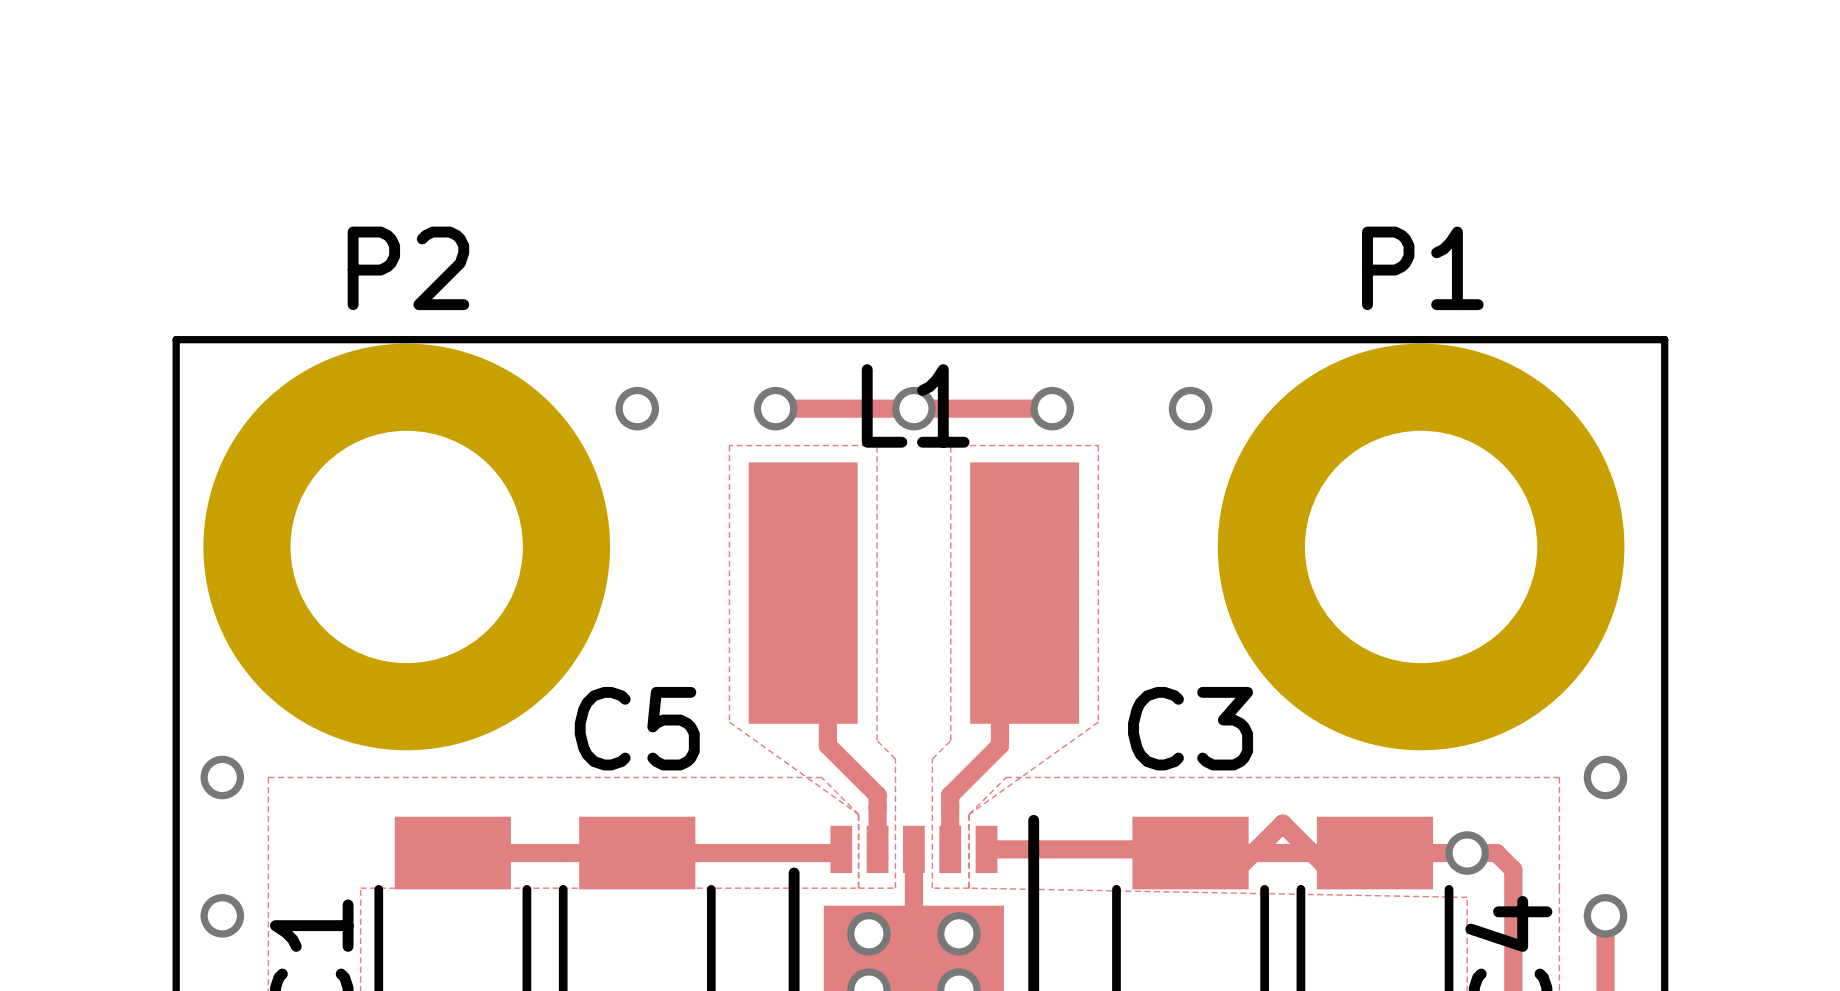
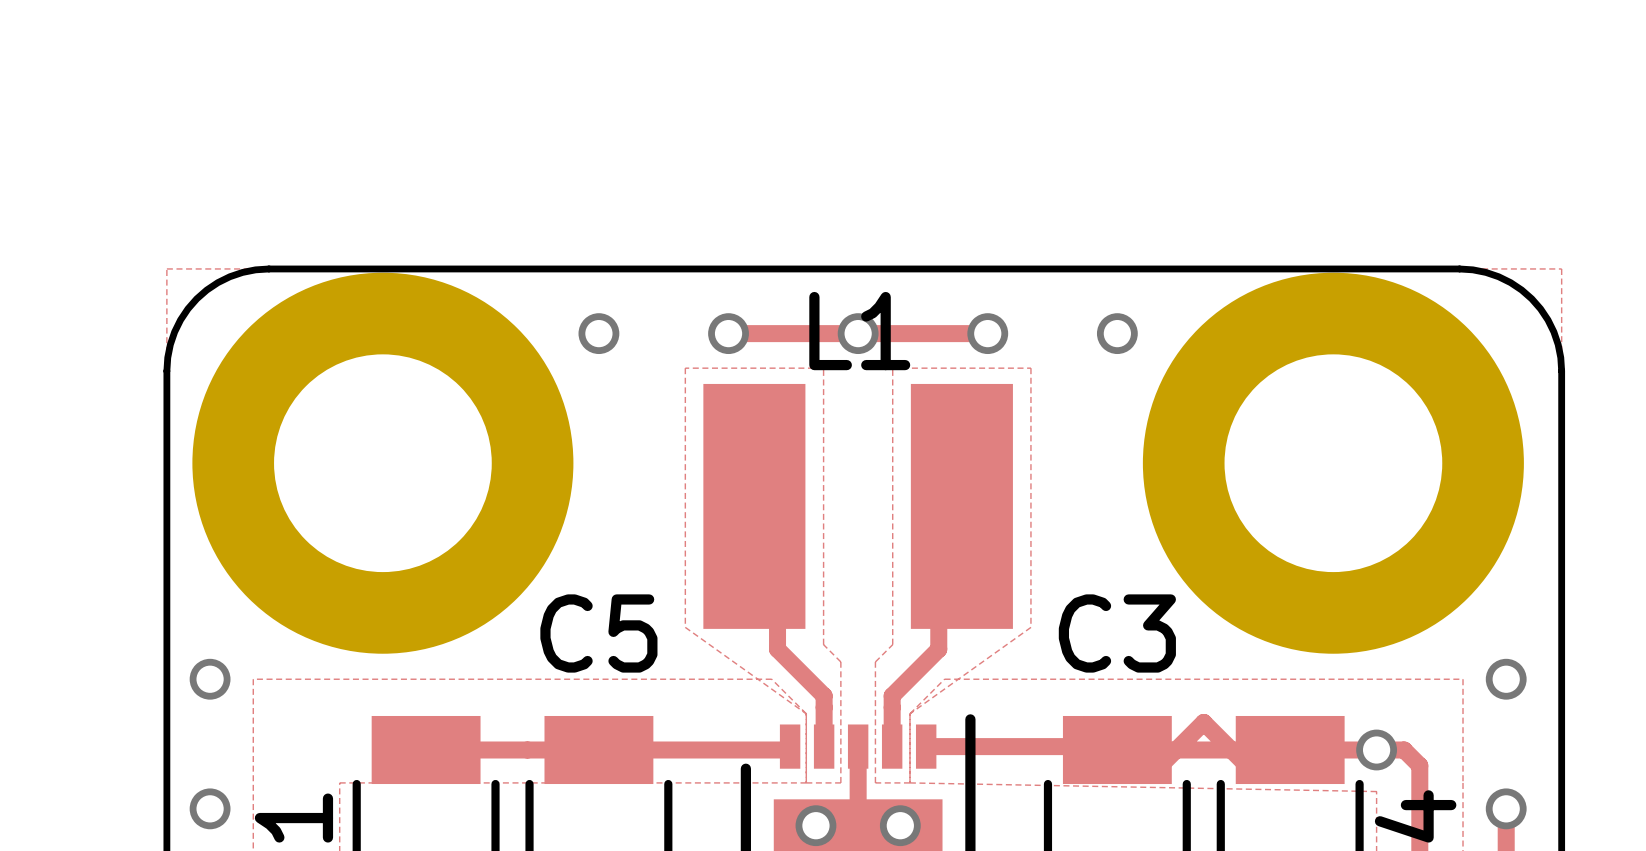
P2 name: P2 (408, 268) -> none
P1 name: P1 (1422, 268) -> none
board edge: (285, 339) (176, 339) (176, 448) -> (268, 268) (255, 269) (229, 276) (206, 290) (196, 298) (187, 308) (174, 331) (167, 357) (166, 371)
board edge: (1555, 339) (1664, 339) (1664, 448) -> (1459, 268) (1472, 269) (1498, 276) (1521, 290) (1531, 298) (1540, 308) (1553, 331) (1558, 344) (1561, 371)

